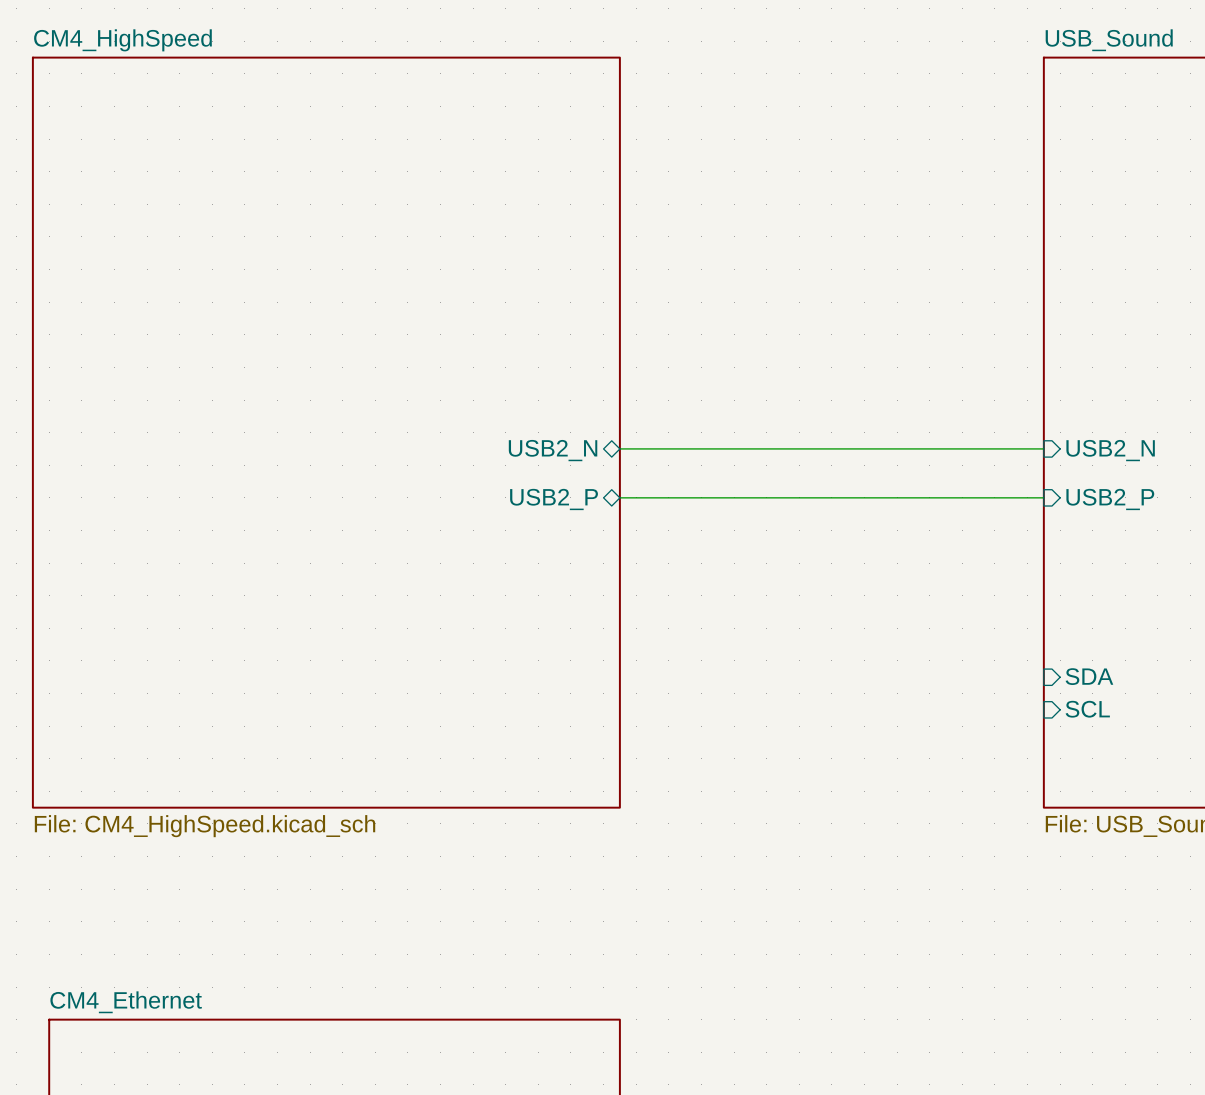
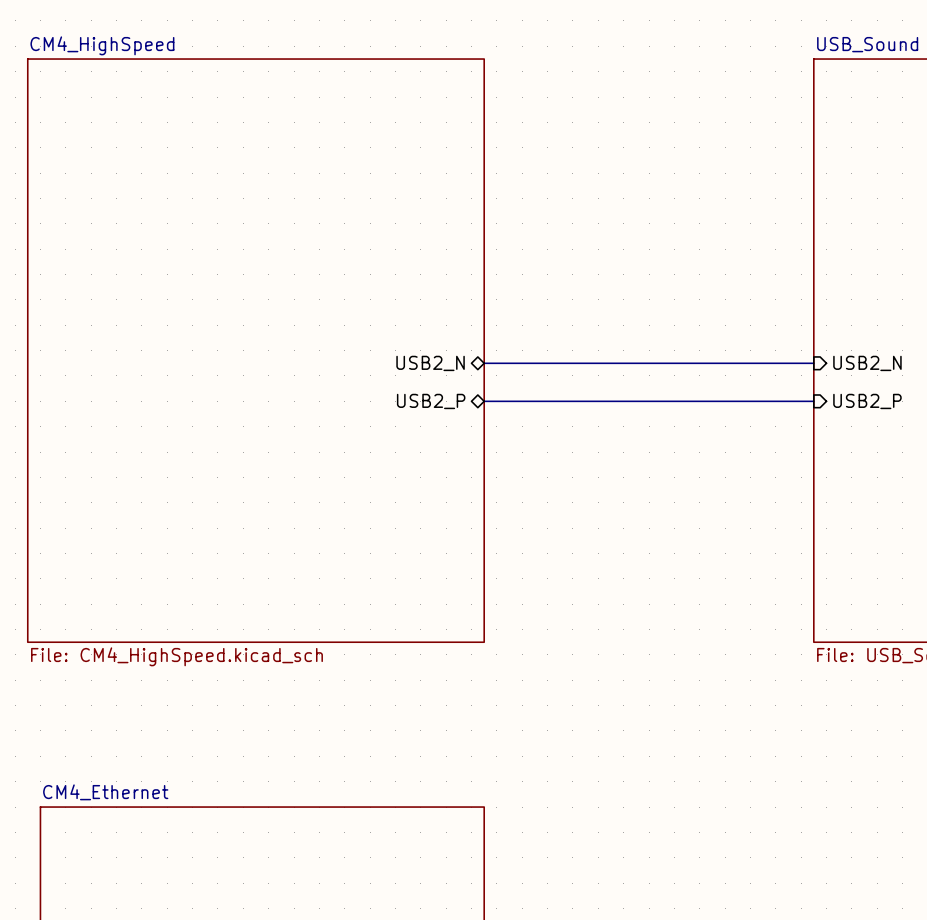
sheet pin: SDA (1089, 676) -> none
sheet pin: SCL (1087, 709) -> none

